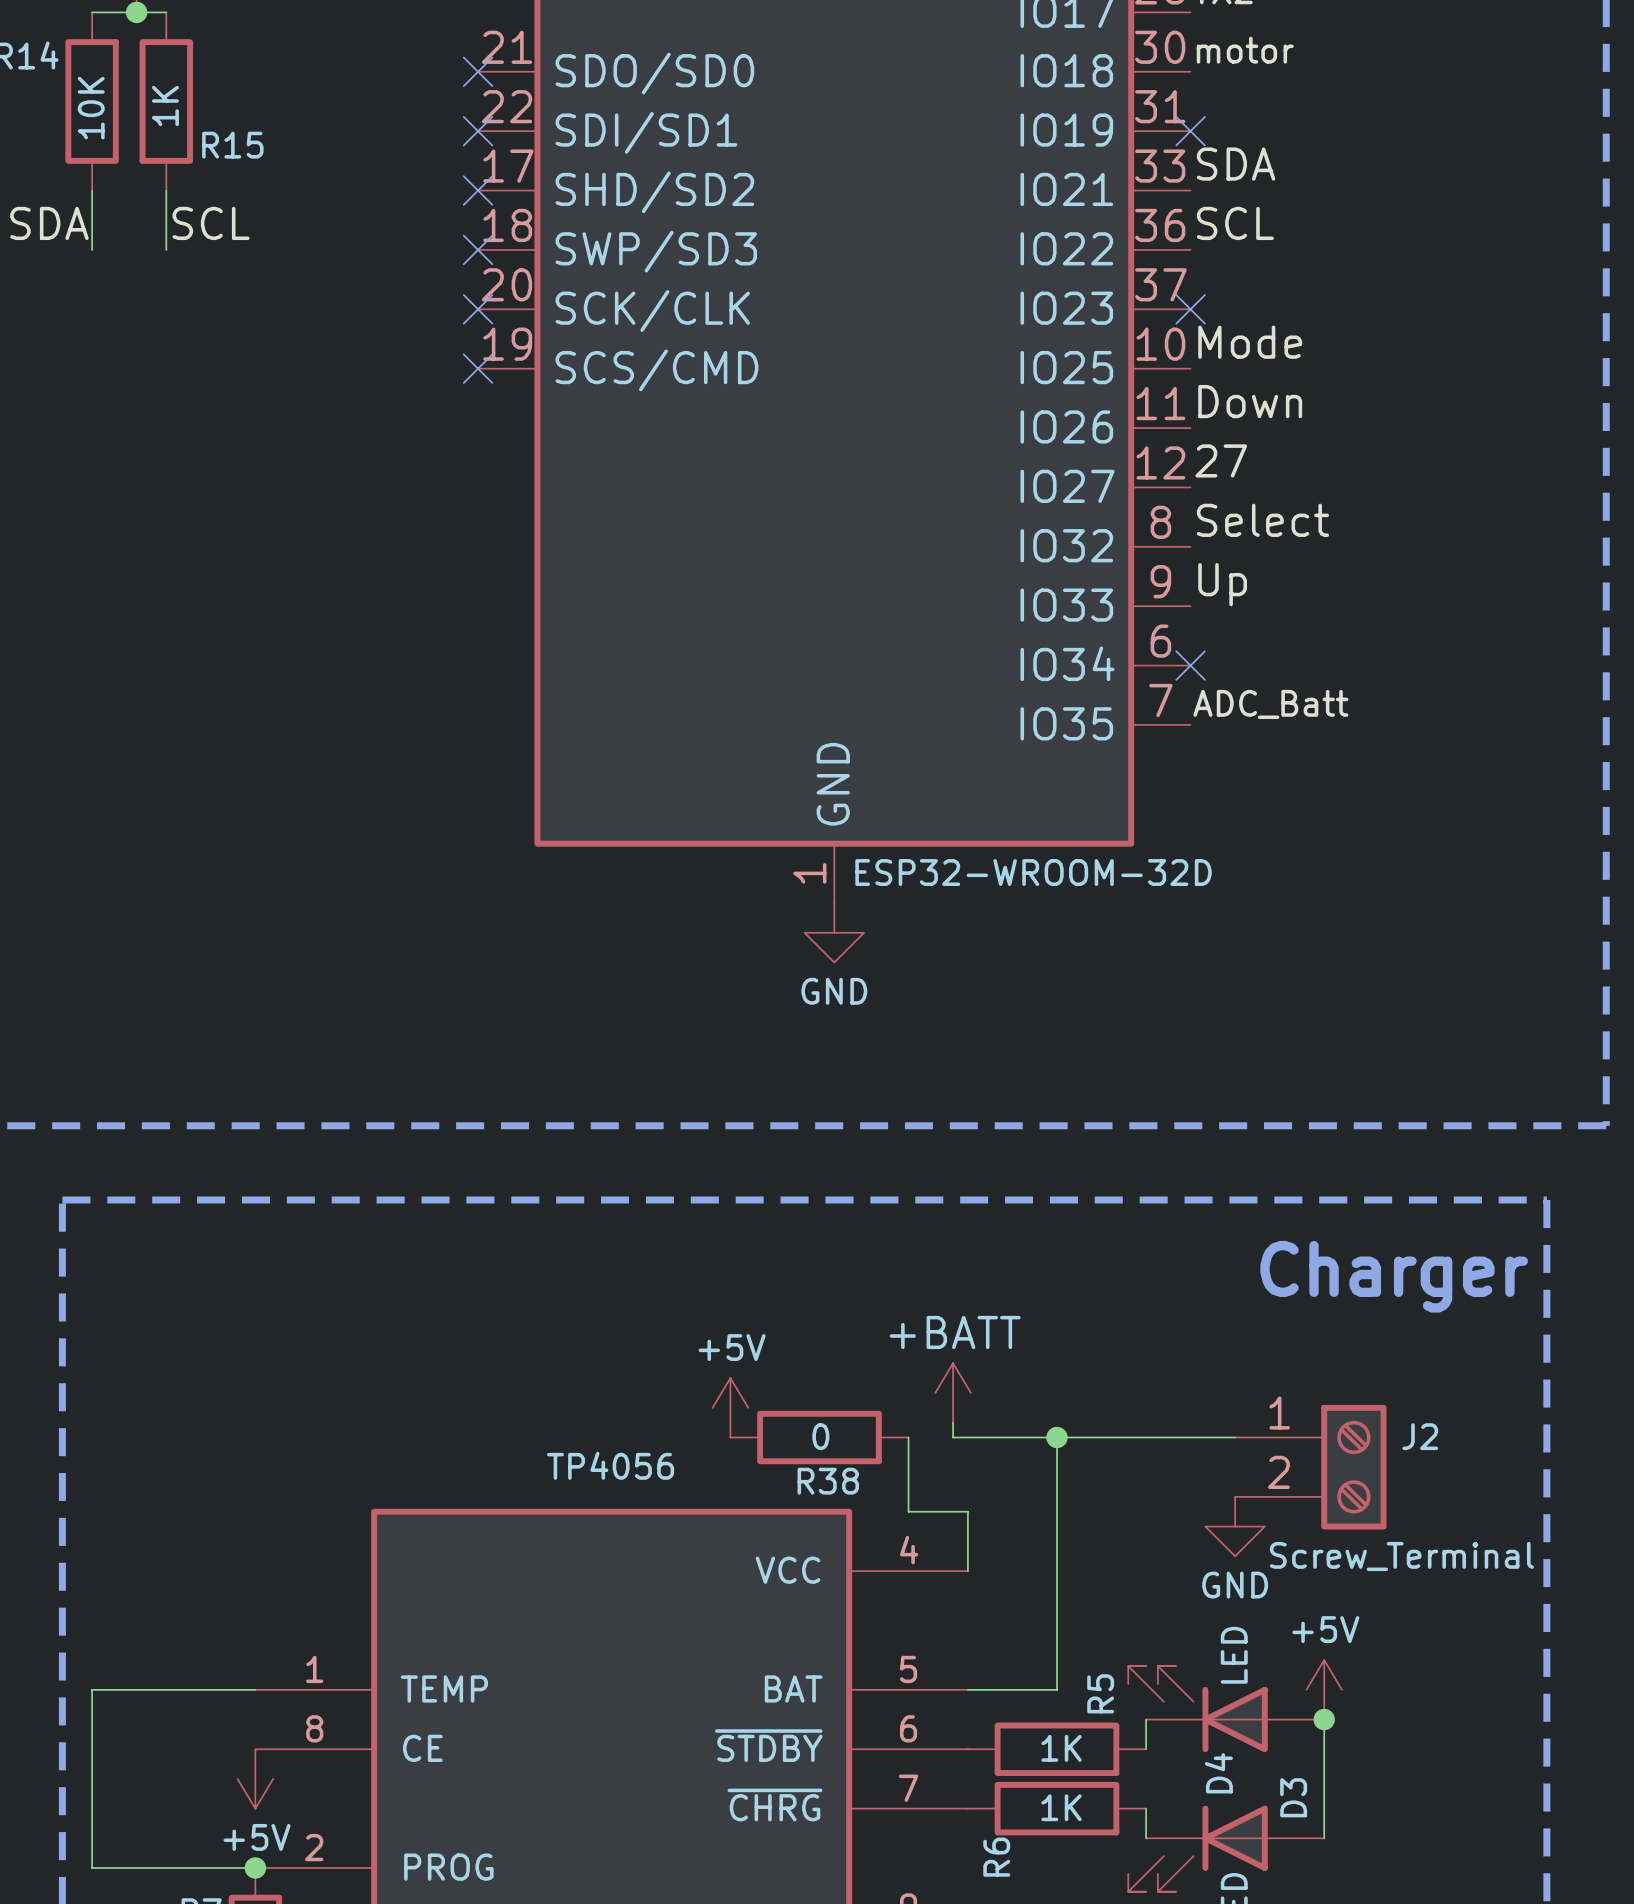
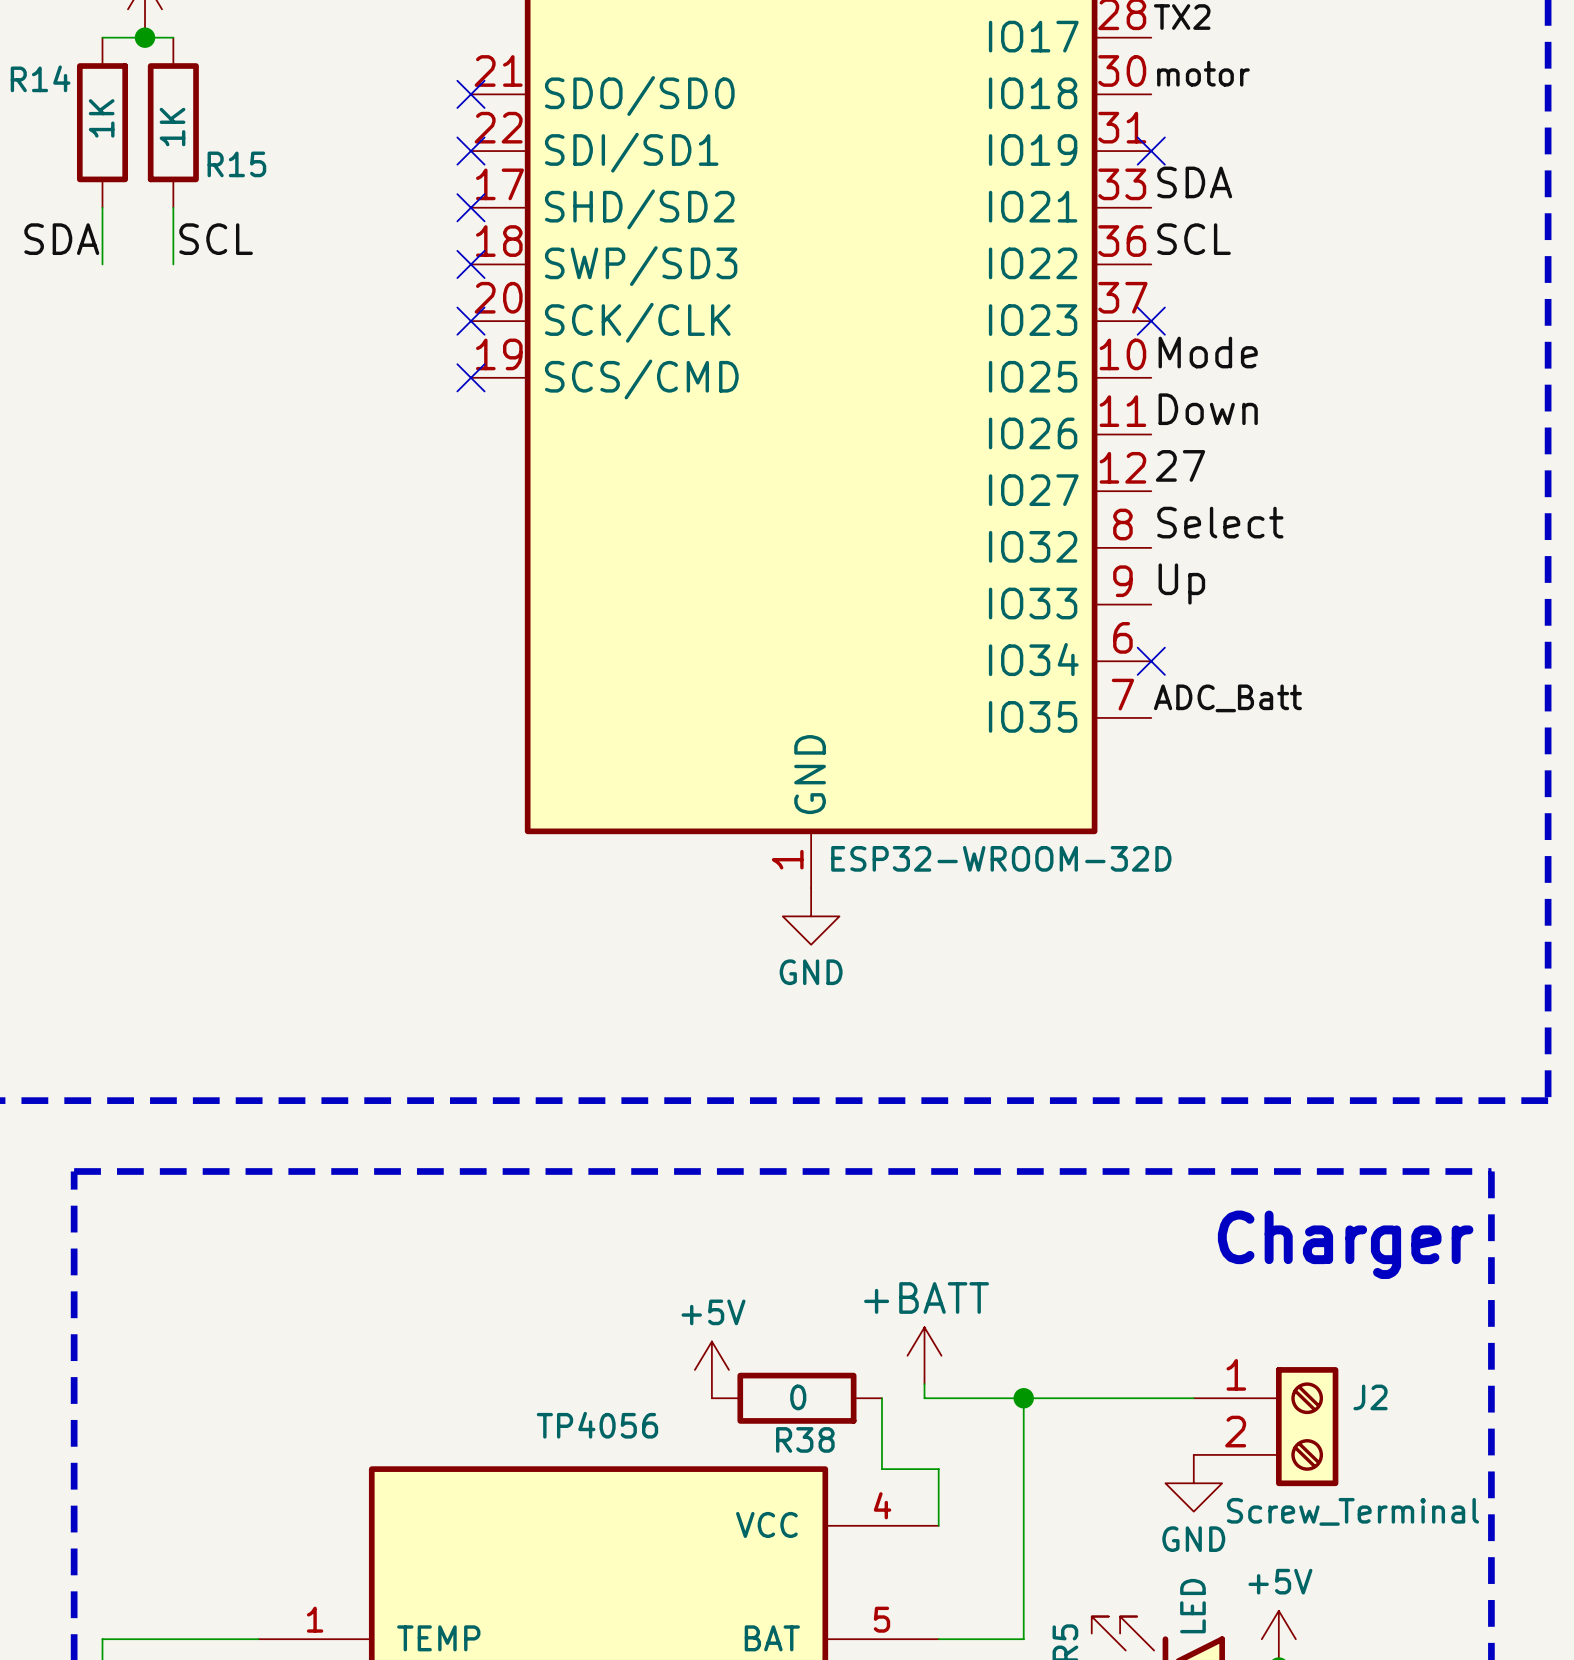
R14 value: 10K (91, 108) -> 1K (101, 118)

